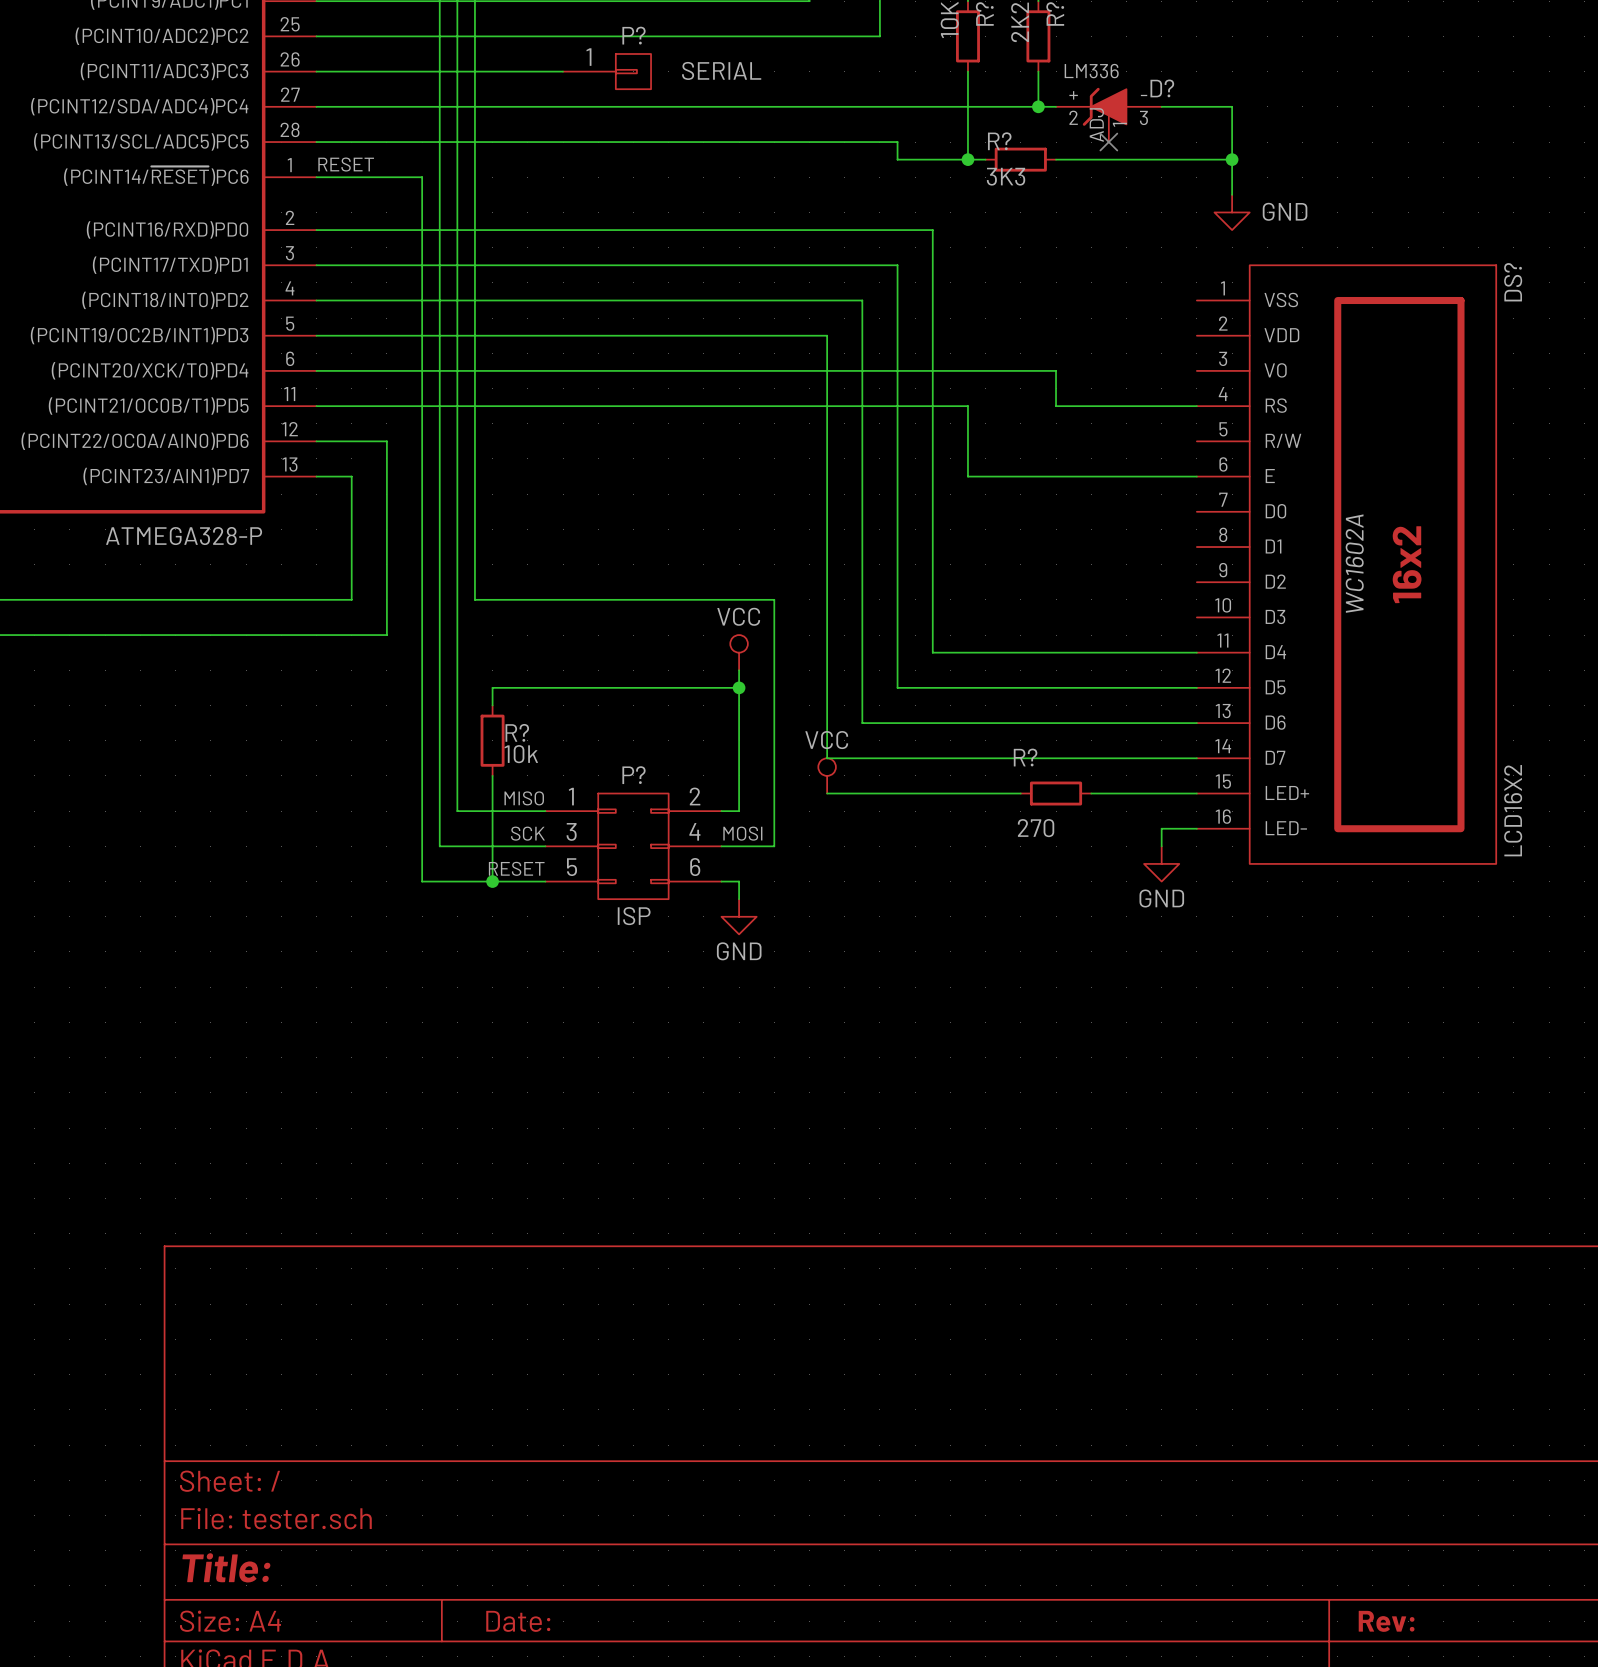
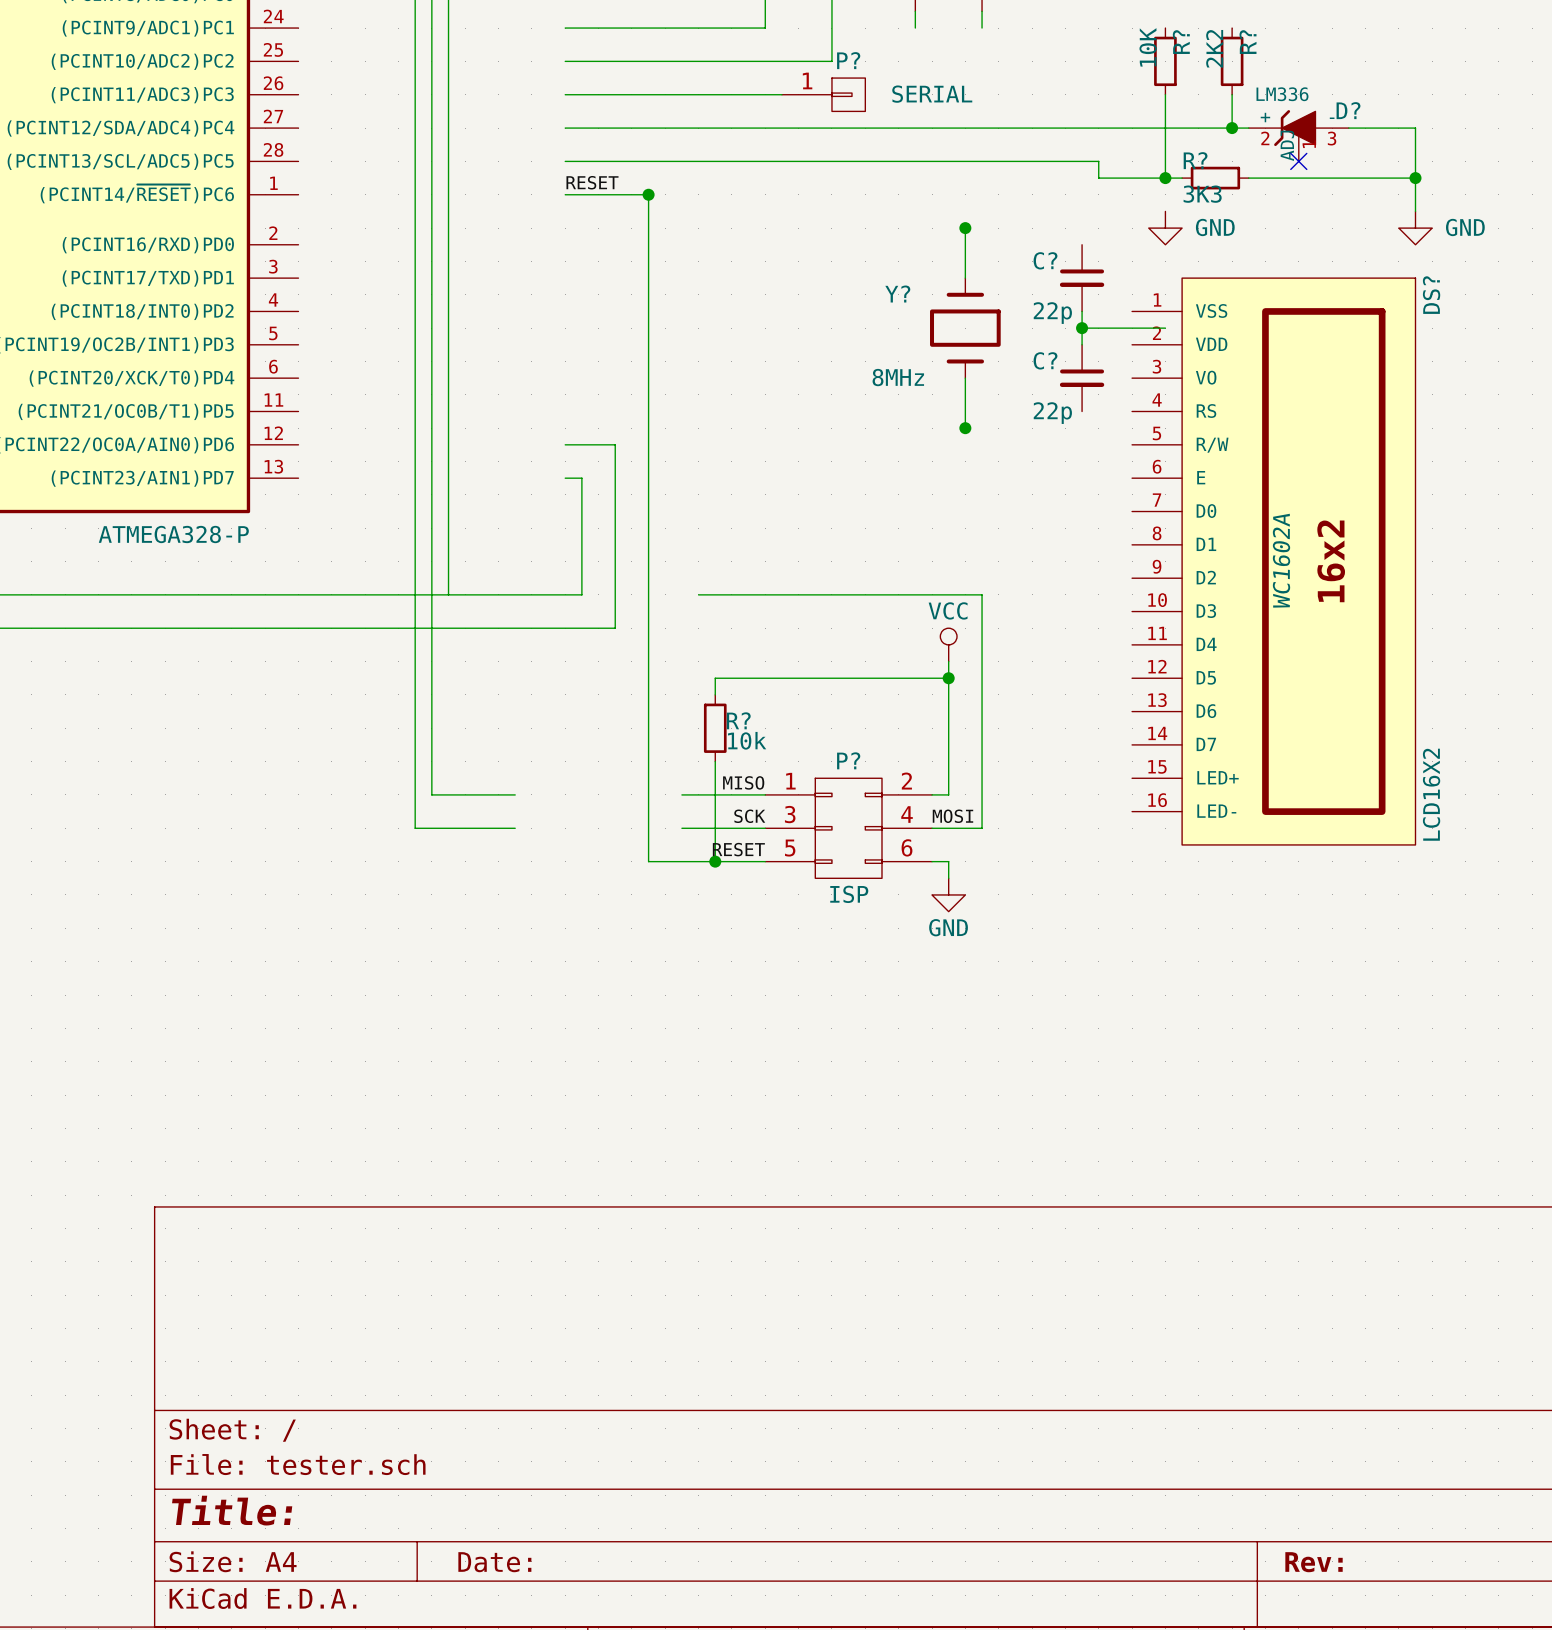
wire: (316, 1) (598, 1) -> none
wire: (316, 36) (598, 36) -> none
R? position: (967, 36) -> (1165, 61)
R? position: (1038, 36) -> (1232, 61)
wire: (316, 71) (563, 71) -> none
wire: none -> (565, 94) (781, 94)
P? position: (607, 71) -> (823, 94)
wire: (967, 71) (967, 159) -> none
wire: (1038, 71) (1038, 106) -> (1232, 94) (1232, 128)
wire: none -> (1165, 94) (1165, 128) (1248, 128)
wire: (316, 106) (598, 106) -> none
junction: (1038, 106) -> none
junction: none -> (1232, 128)
wire: none -> (1348, 128) (1415, 128) (1415, 211)
D? position: (1108, 114) -> (1298, 135)
wire: (316, 142) (598, 142) -> none
wire: (897, 142) (897, 159) (985, 159) -> none
no-connect mark: (1108, 142) -> none
no-connect mark: none -> (1298, 161)
junction: (967, 159) -> none
R? position: (1020, 159) -> (1215, 178)
wire: (1056, 159) (1161, 159) -> (848, 161) (1098, 161) (1098, 178)
wire: (1232, 159) (1232, 194) -> (1165, 178) (1182, 178)
wire: none -> (1248, 178) (1415, 178)
junction: none -> (1415, 178)
label position: RESET (346, 164) -> RESET (592, 182)
wire: (316, 177) (422, 177) (422, 881) (545, 881) -> none
wire: none -> (565, 194) (648, 194) (648, 861) (681, 861)
junction: none -> (648, 194)
wire: none -> (965, 228) (965, 278)
junction: none -> (965, 228)
power symbol: none -> GND (1415, 228)
wire: (316, 230) (932, 230) (932, 652) (1196, 652) -> none
wire: (316, 265) (897, 265) (897, 687) -> (715, 694) (715, 678) (848, 678)
C?: none -> 22p (1082, 278)
wire: (316, 300) (862, 300) (862, 723) (1196, 723) -> none
wire: none -> (1082, 311) (1082, 344)
Y?: none -> 8MHz (965, 328)
wire: none -> (1082, 328) (1165, 328)
junction: none -> (1082, 328)
wire: (316, 335) (827, 335) (827, 758) (1196, 758) -> none
wire: (316, 370) (1056, 370) (1056, 406) (1196, 406) -> none
wire: none -> (965, 378) (965, 428)
C?: none -> 22p (1082, 378)
wire: (316, 406) (967, 406) (967, 476) (1196, 476) -> none
junction: none -> (965, 428)
wire: (316, 441) (386, 441) (386, 635) -> (565, 444) (615, 444) (615, 628) (365, 628)
wire: (316, 476) (351, 476) (351, 599) -> (448, 594) (331, 594)
wire: (615, 599) (739, 599) -> (581, 594) (581, 478) (565, 478)
wire: (774, 599) (774, 846) -> (731, 594) (982, 594) (982, 828) (932, 828)
power symbol: VCC (739, 652) -> none
power symbol: none -> VCC (948, 644)
wire: (739, 670) (739, 811) -> (765, 794) (698, 794)
wire: none -> (948, 661) (948, 794) (932, 794)
wire: (739, 687) (492, 687) (492, 705) -> none
junction: (739, 687) -> none
wire: (1003, 687) (1196, 687) -> none
junction: none -> (948, 678)
R? position: (492, 740) -> (715, 728)
wire: (492, 775) (492, 881) -> (715, 761) (715, 861)
power symbol: VCC (827, 775) -> none
wire: (827, 793) (1020, 793) -> none
R?: 270 (1056, 793) -> none
wire: (1091, 793) (1196, 793) -> none
label position: MISO (524, 798) -> MISO (743, 782)
wire: (1196, 828) (1161, 828) (1161, 846) -> none
label position: SCK (527, 833) -> SCK (749, 816)
label position: MOSI (742, 833) -> MOSI (952, 816)
P? position: (633, 846) -> (848, 828)
wire: none -> (731, 828) (765, 828)
power symbol: GND (1161, 863) -> none
label position: RESET (516, 868) -> RESET (738, 849)
junction: (492, 881) -> none
wire: (739, 881) (739, 899) -> (698, 861) (765, 861)
junction: none -> (715, 861)
wire: none -> (932, 861) (948, 861) (948, 878)
power symbol: GND (739, 916) -> none
power symbol: none -> GND (948, 894)

